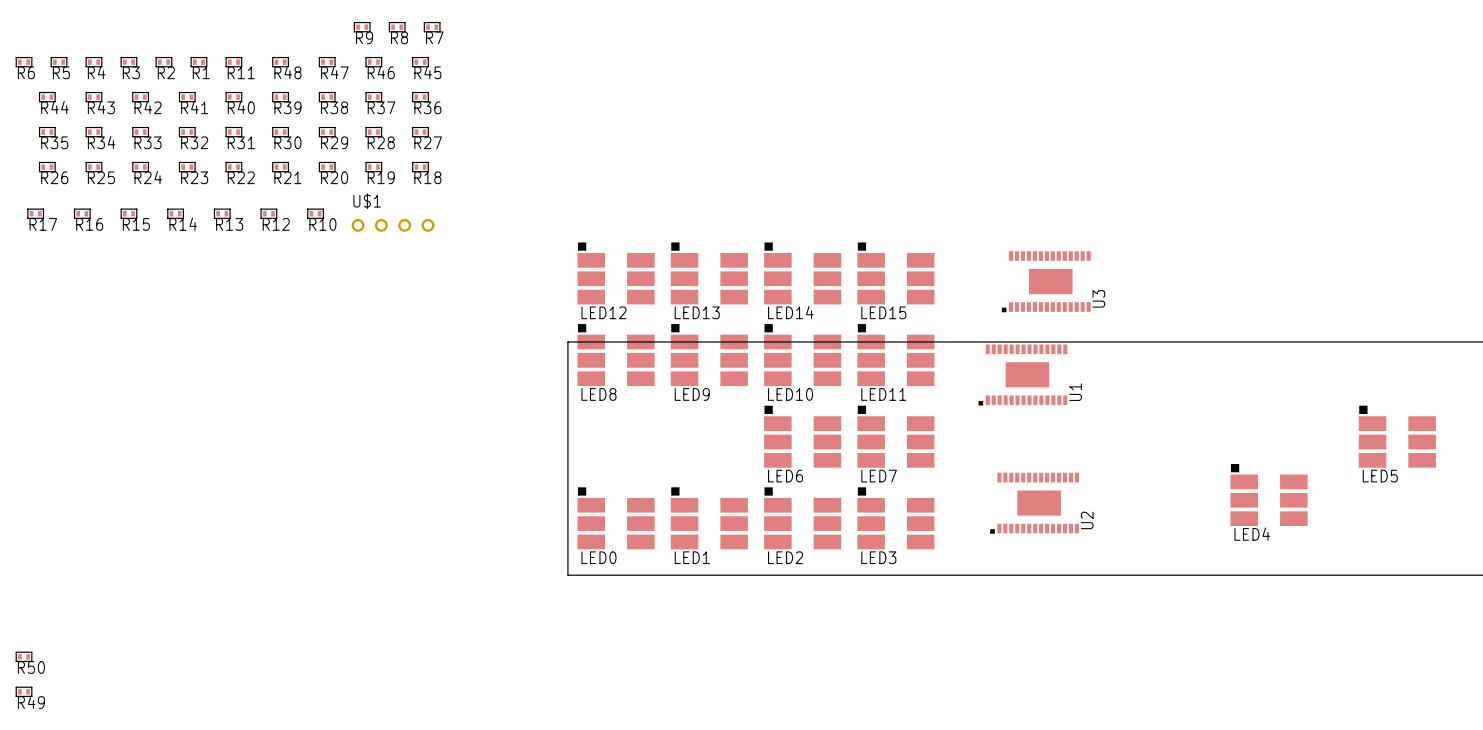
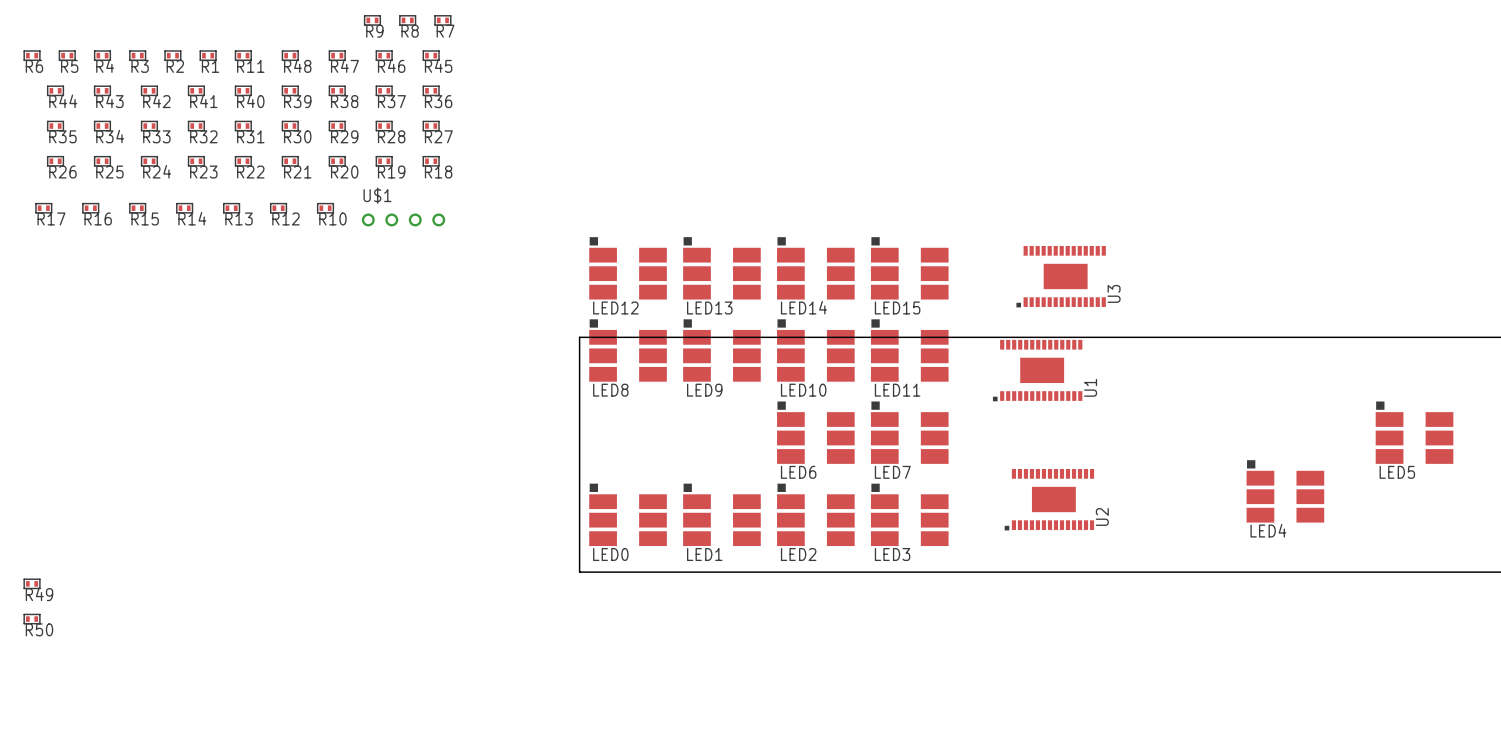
R50 position: (24, 656) -> (32, 619)
R49 position: (24, 691) -> (32, 583)

